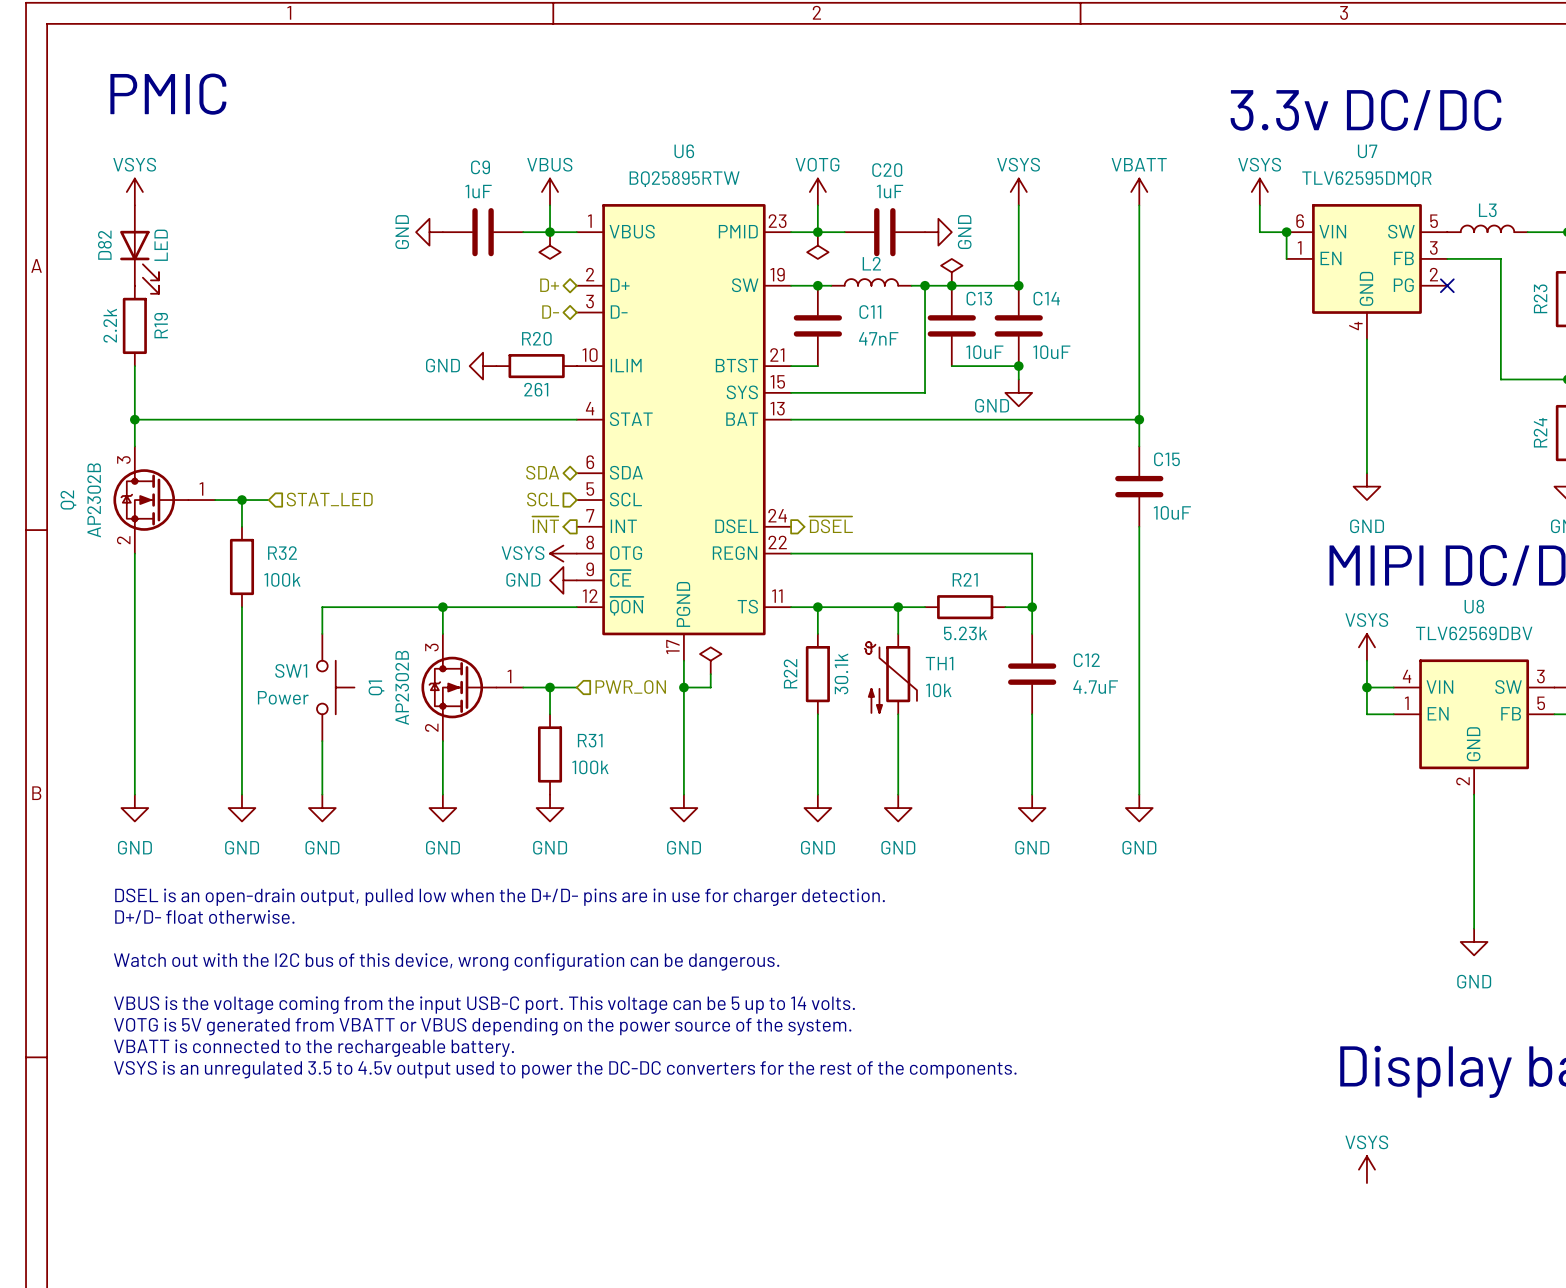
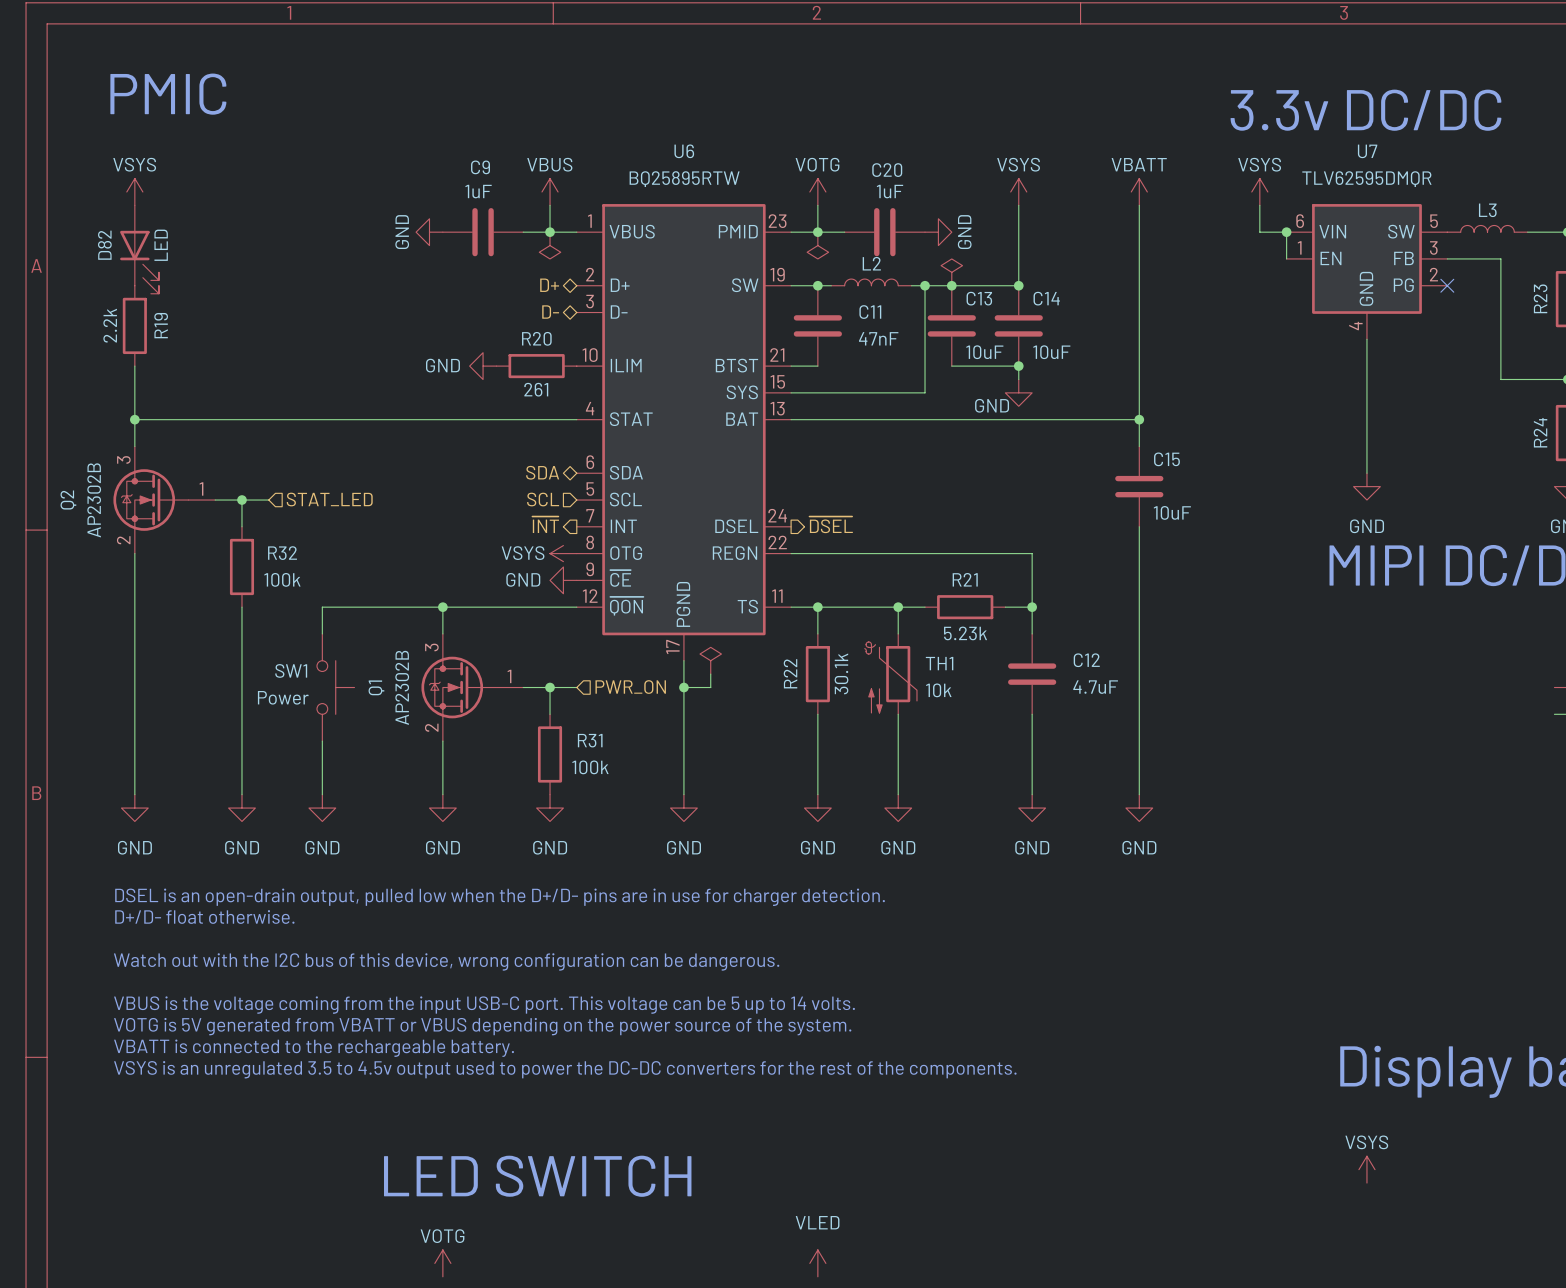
power symbol: VSYS (1366, 647) -> none
wire: (1366, 660) (1366, 714) (1393, 714) -> none
wire: (1366, 687) (1393, 687) -> none
junction: (1366, 687) -> none
U8: TLV62569DBV (1474, 727) -> none
wire: (1474, 794) (1474, 928) -> none
power symbol: GND (1474, 941) -> none
text: none -> LED SWITCH (537, 1176)
power symbol: none -> VOTG (442, 1263)
power symbol: none -> VLED (817, 1263)

